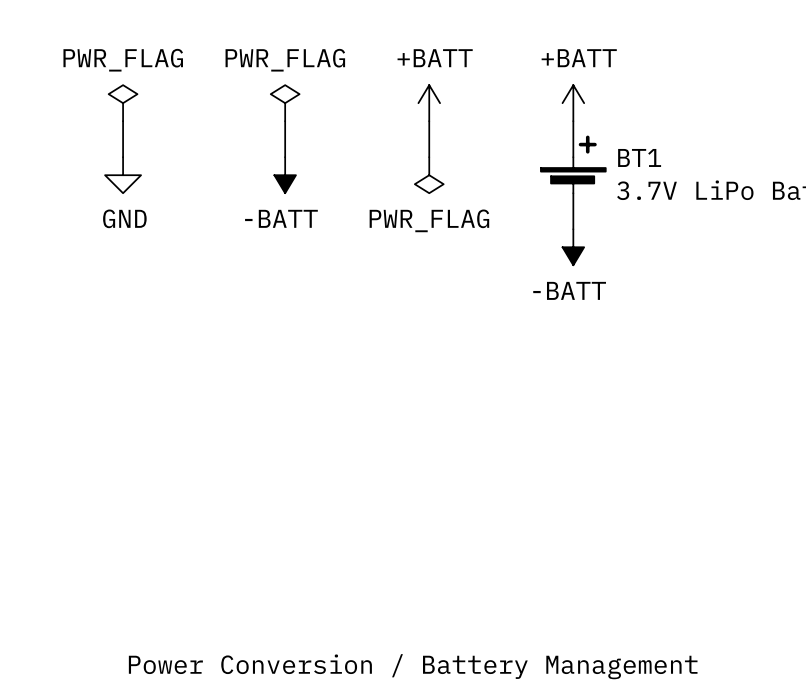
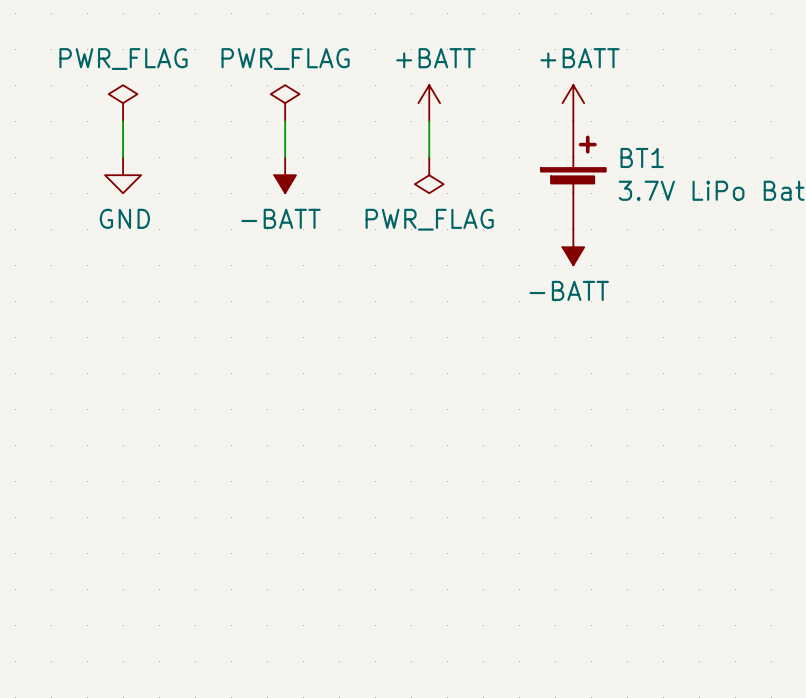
text: Power Conversion / Battery Management (413, 666) -> none

